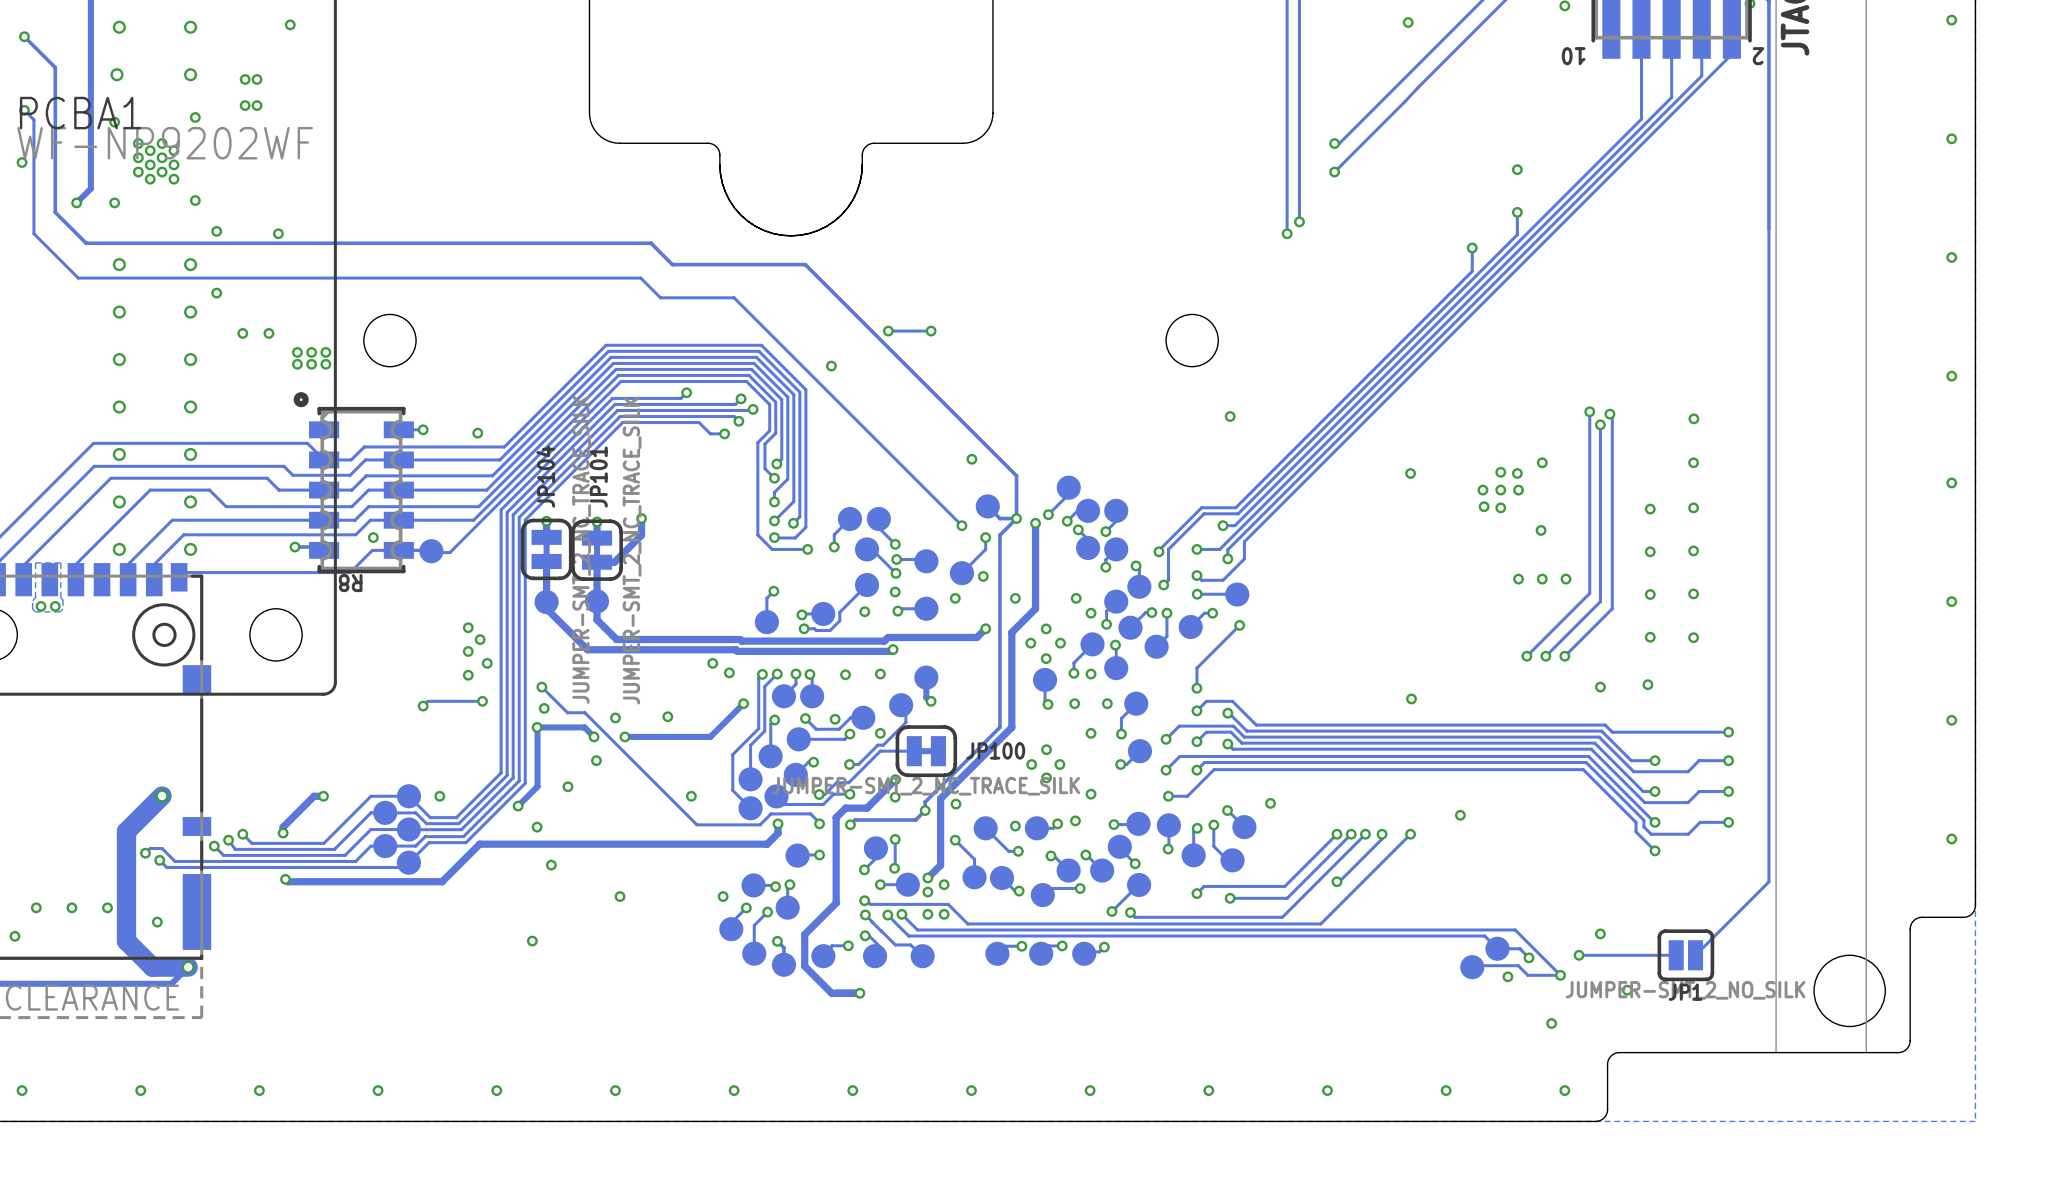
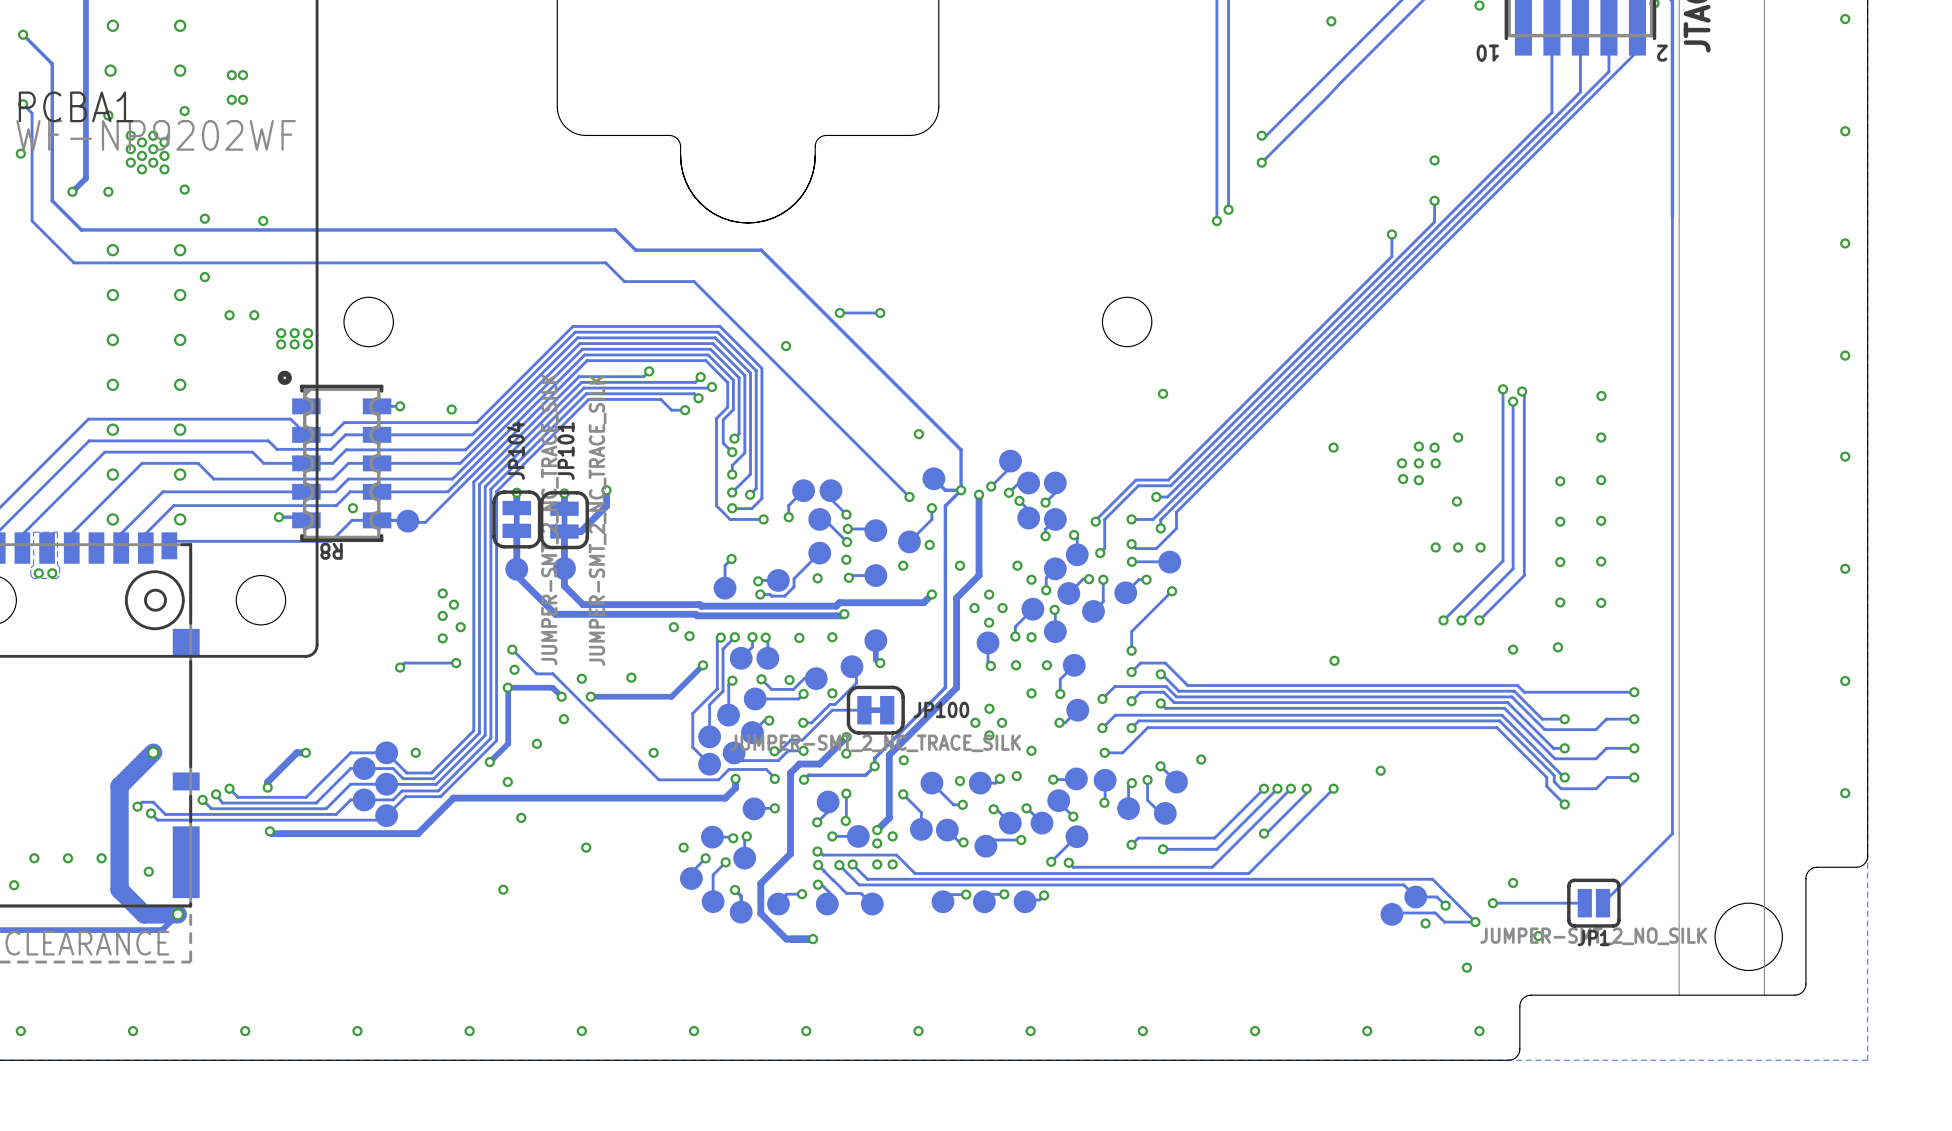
via: (290, 24) -> none

